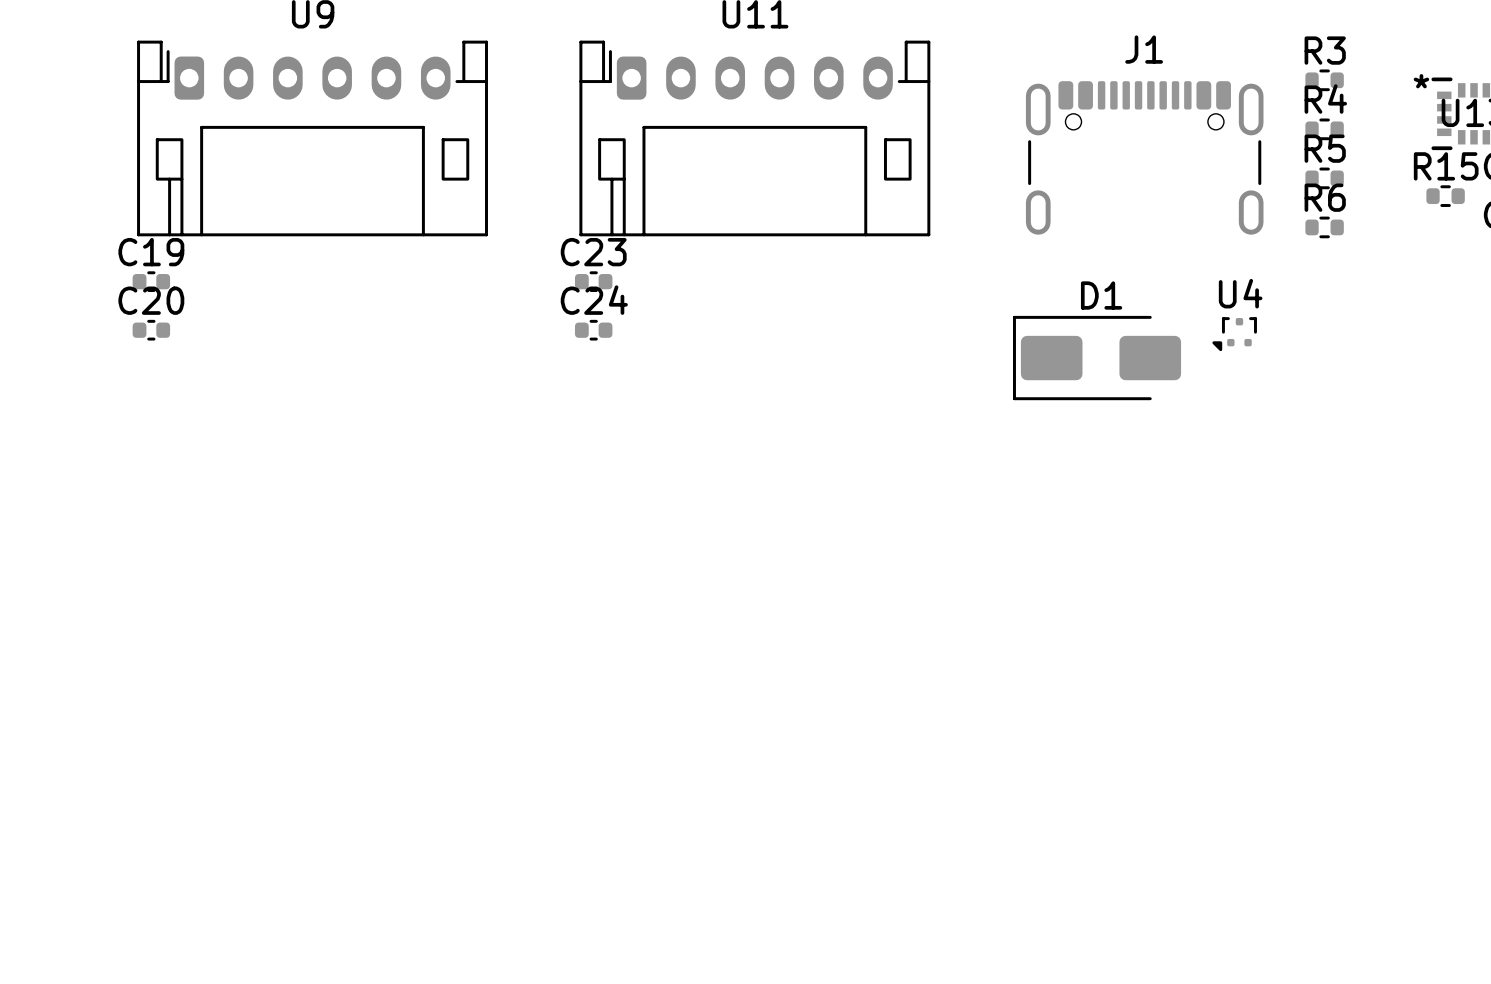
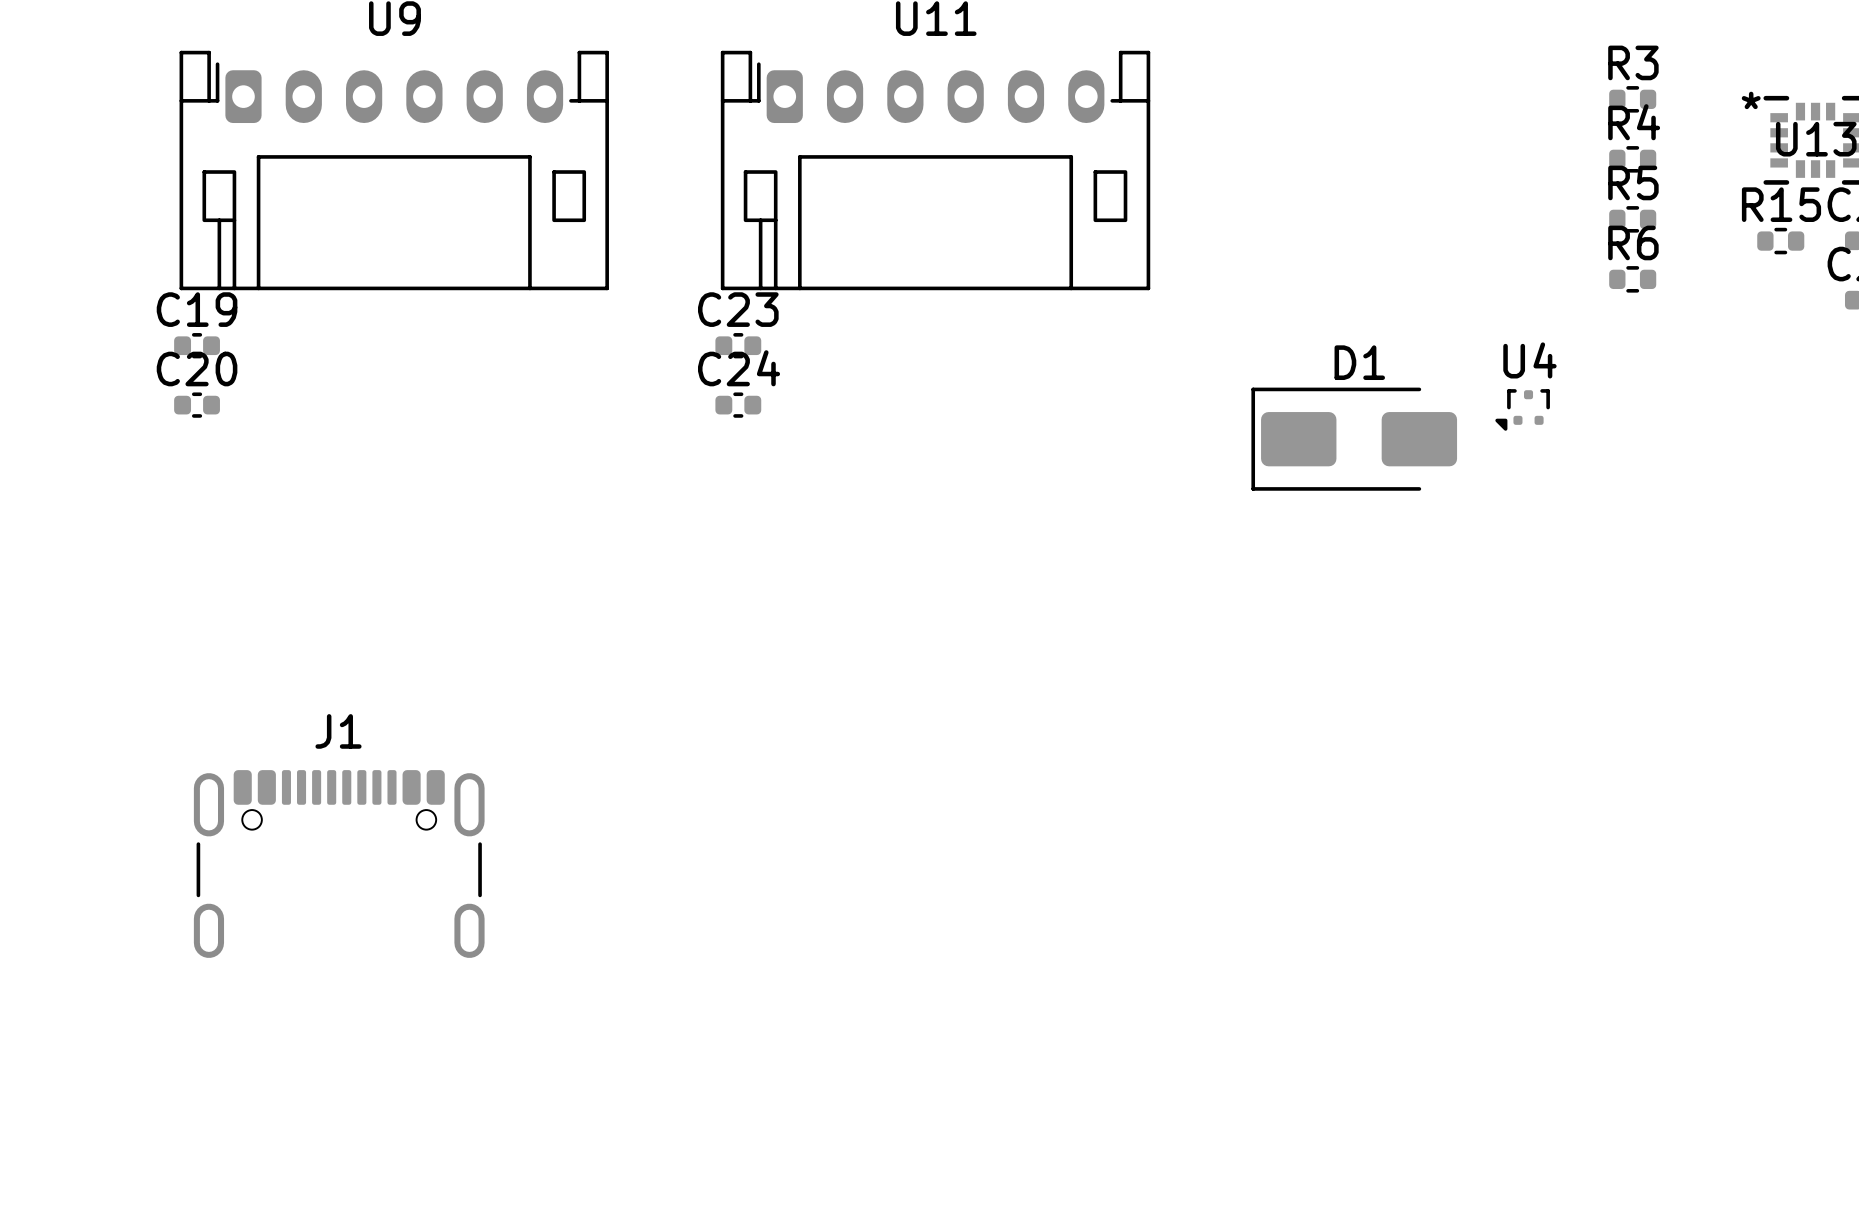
J1 position: (1144, 157) -> (339, 864)

